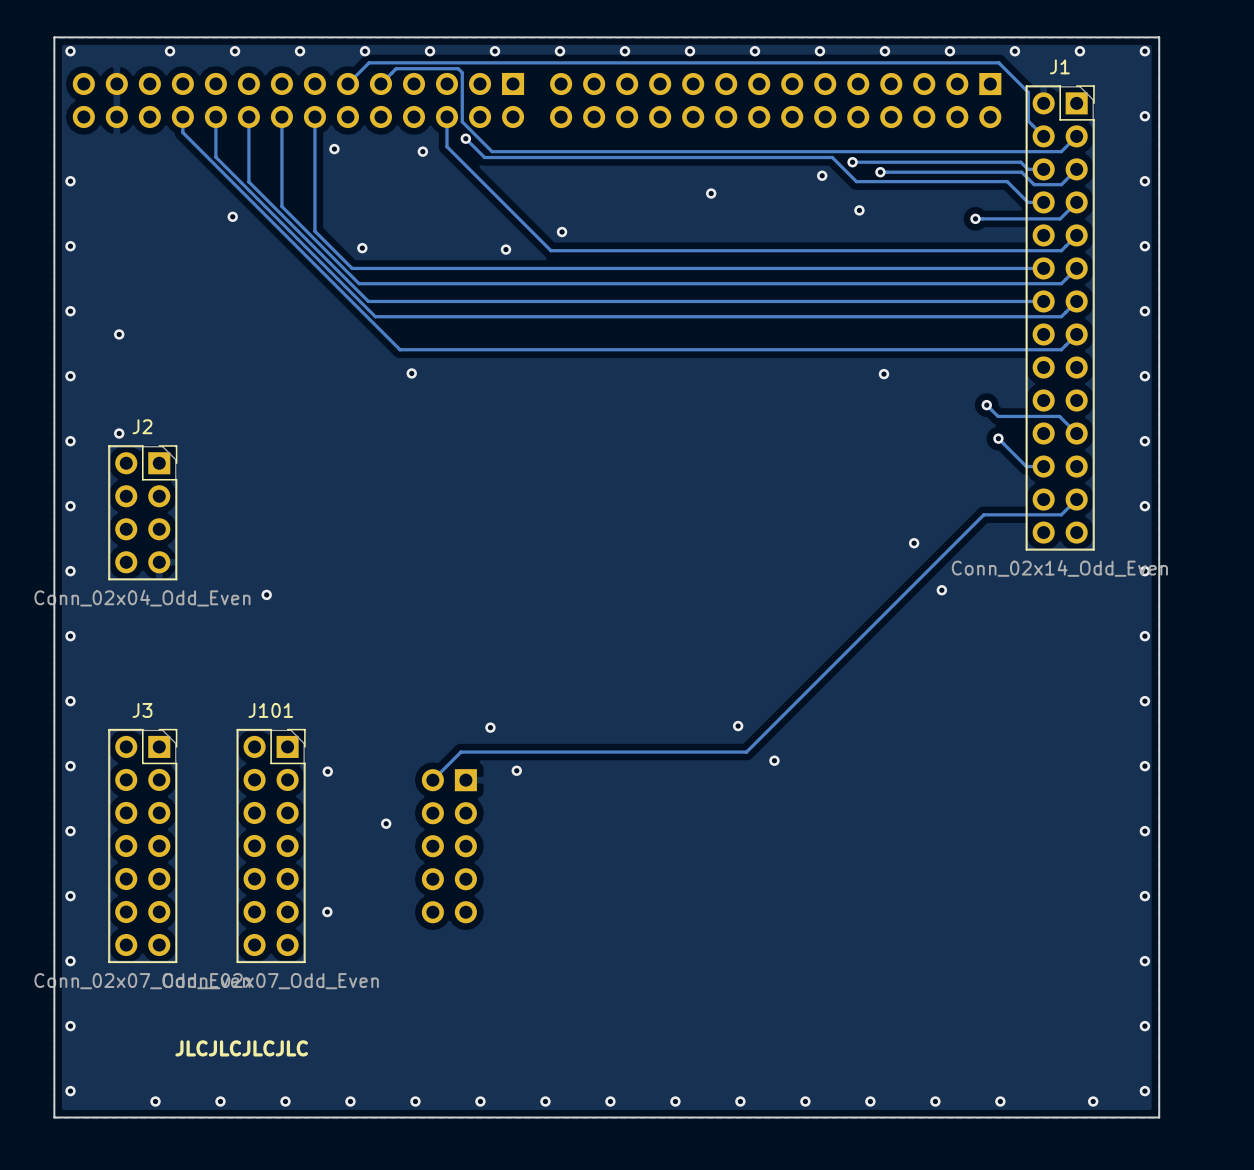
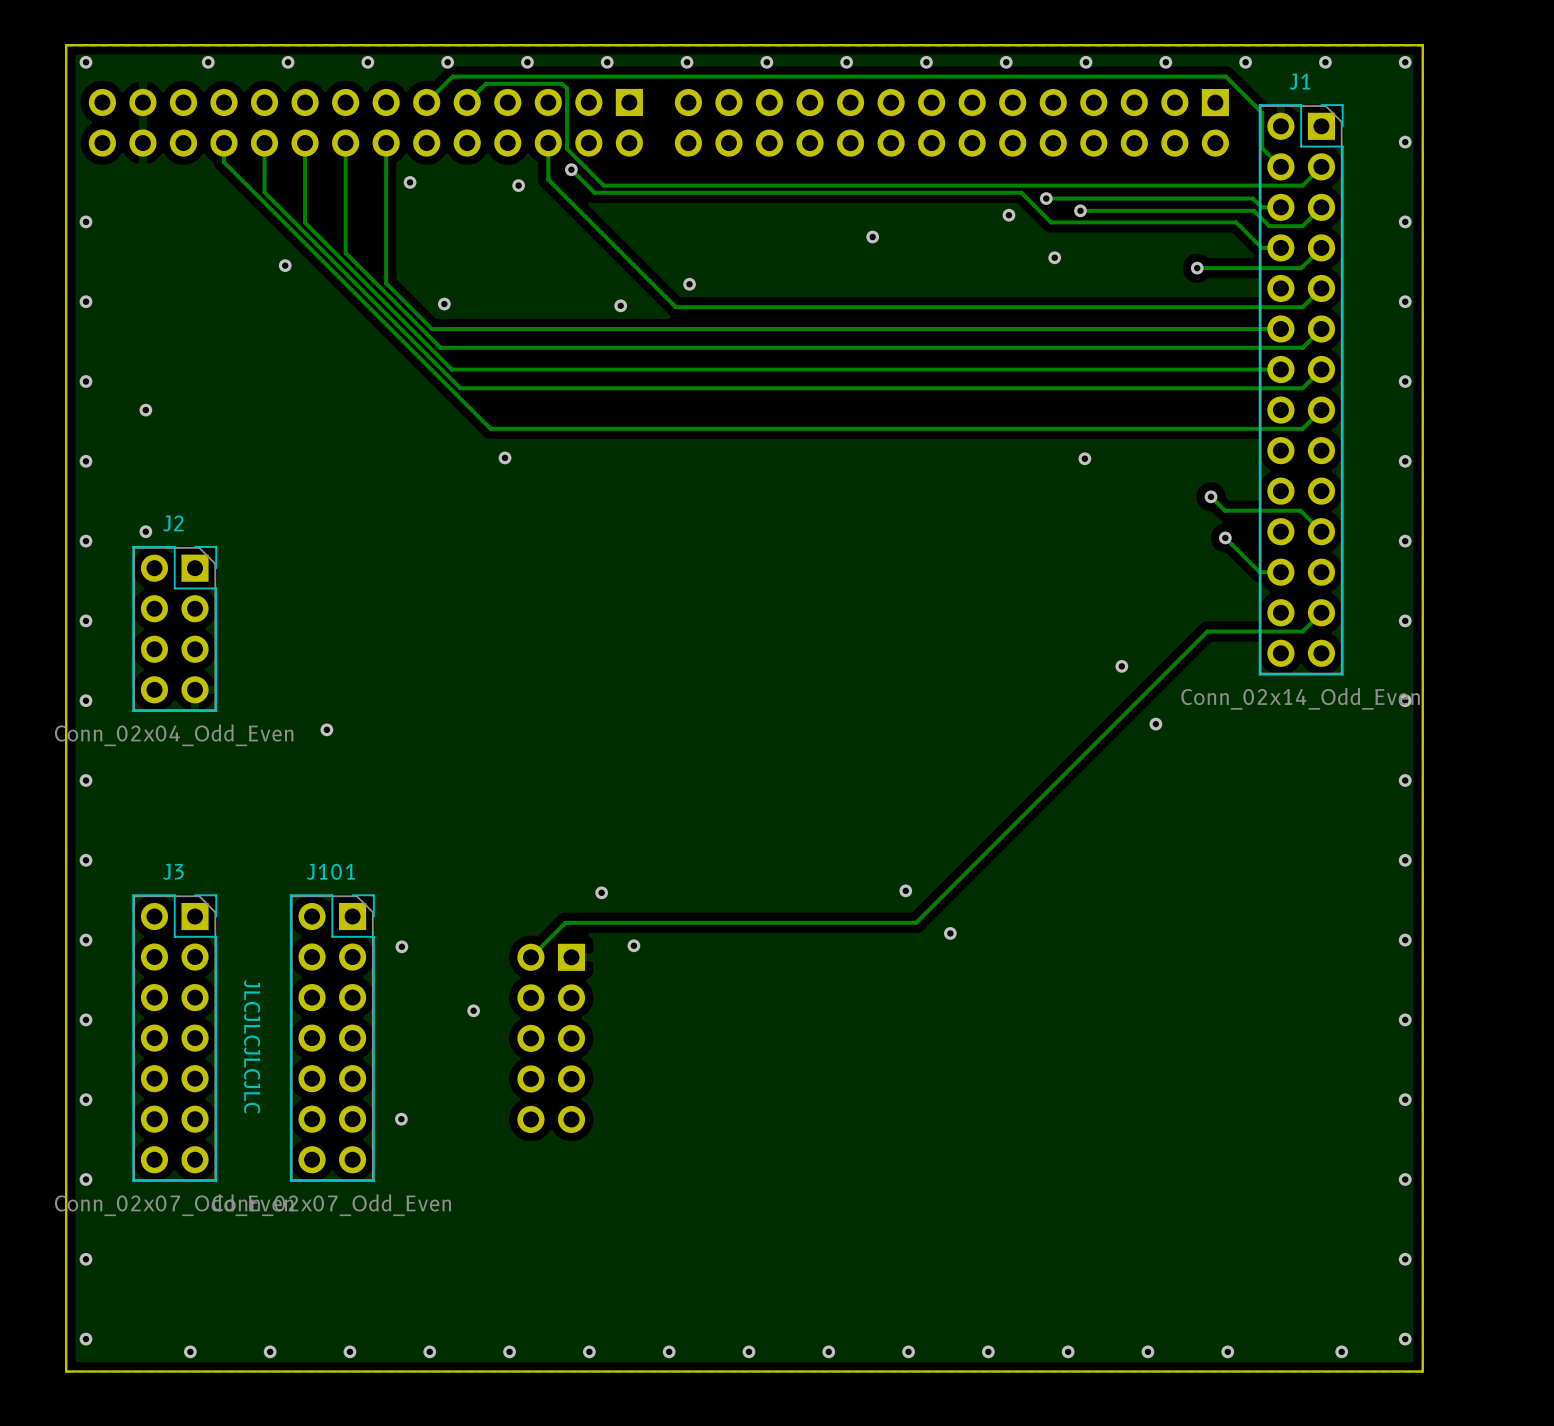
text rotation: 0° (241, 1048) -> 90° clockwise (252, 1046)
text position: JLCJLCJLCJLC (241, 1048) -> JLCJLCJLCJLC (252, 1046)

